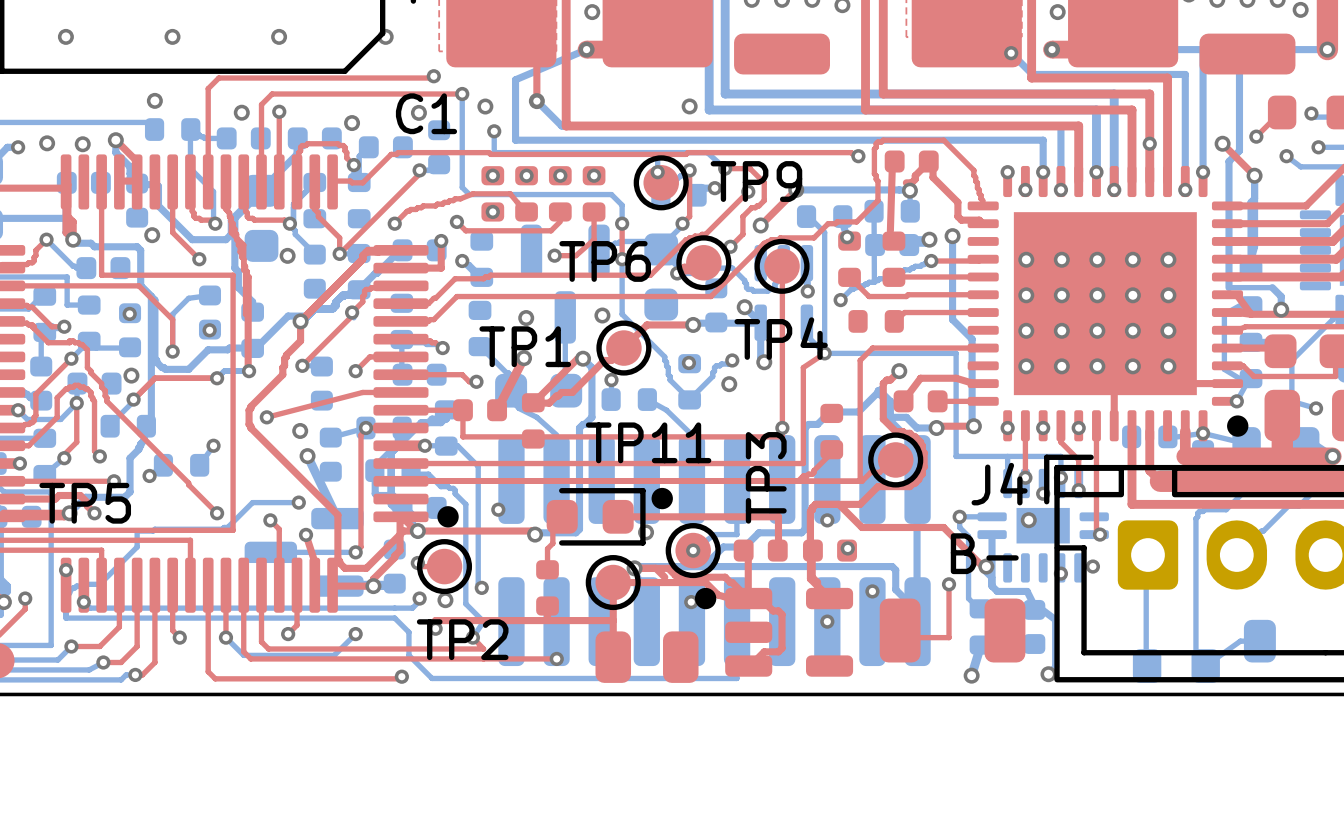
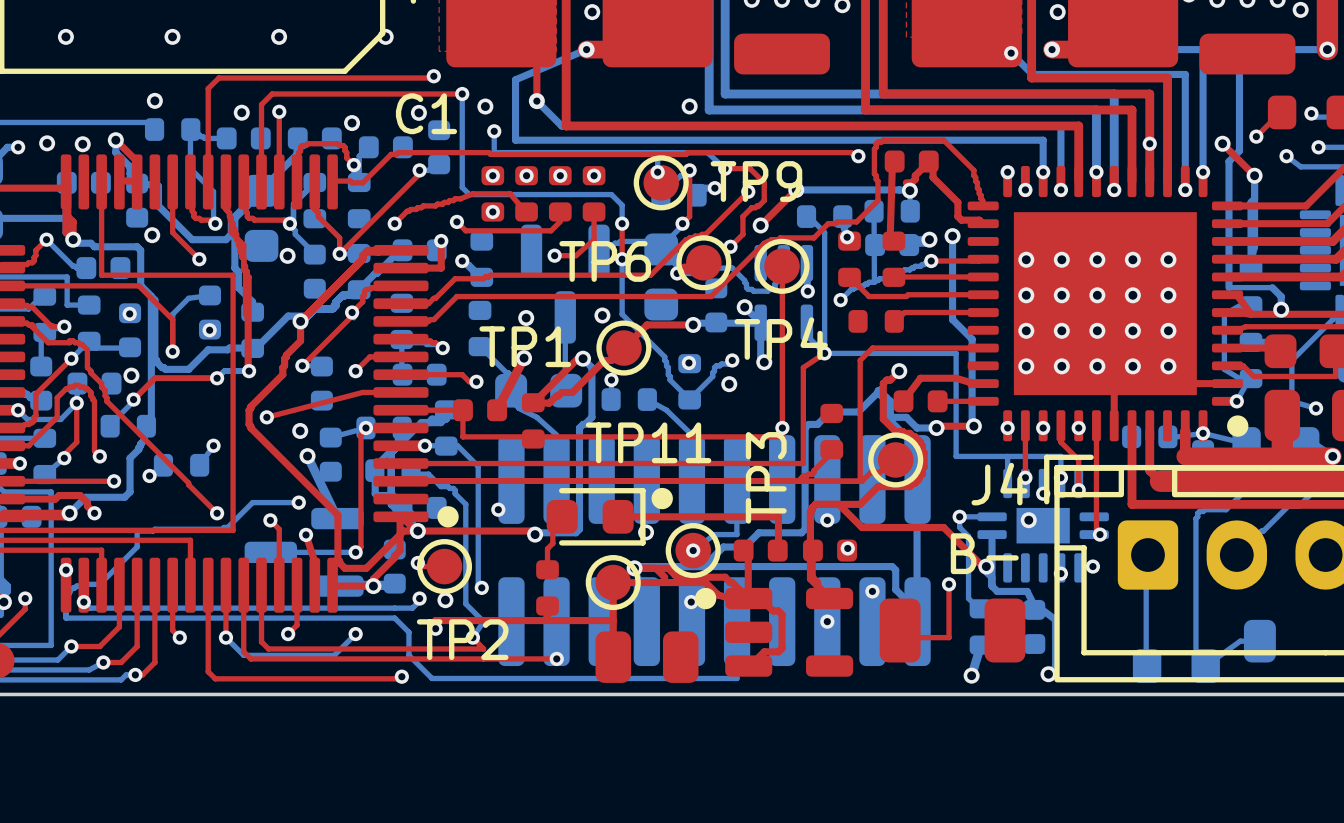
TP5 name: TP5 (85, 503) -> none

